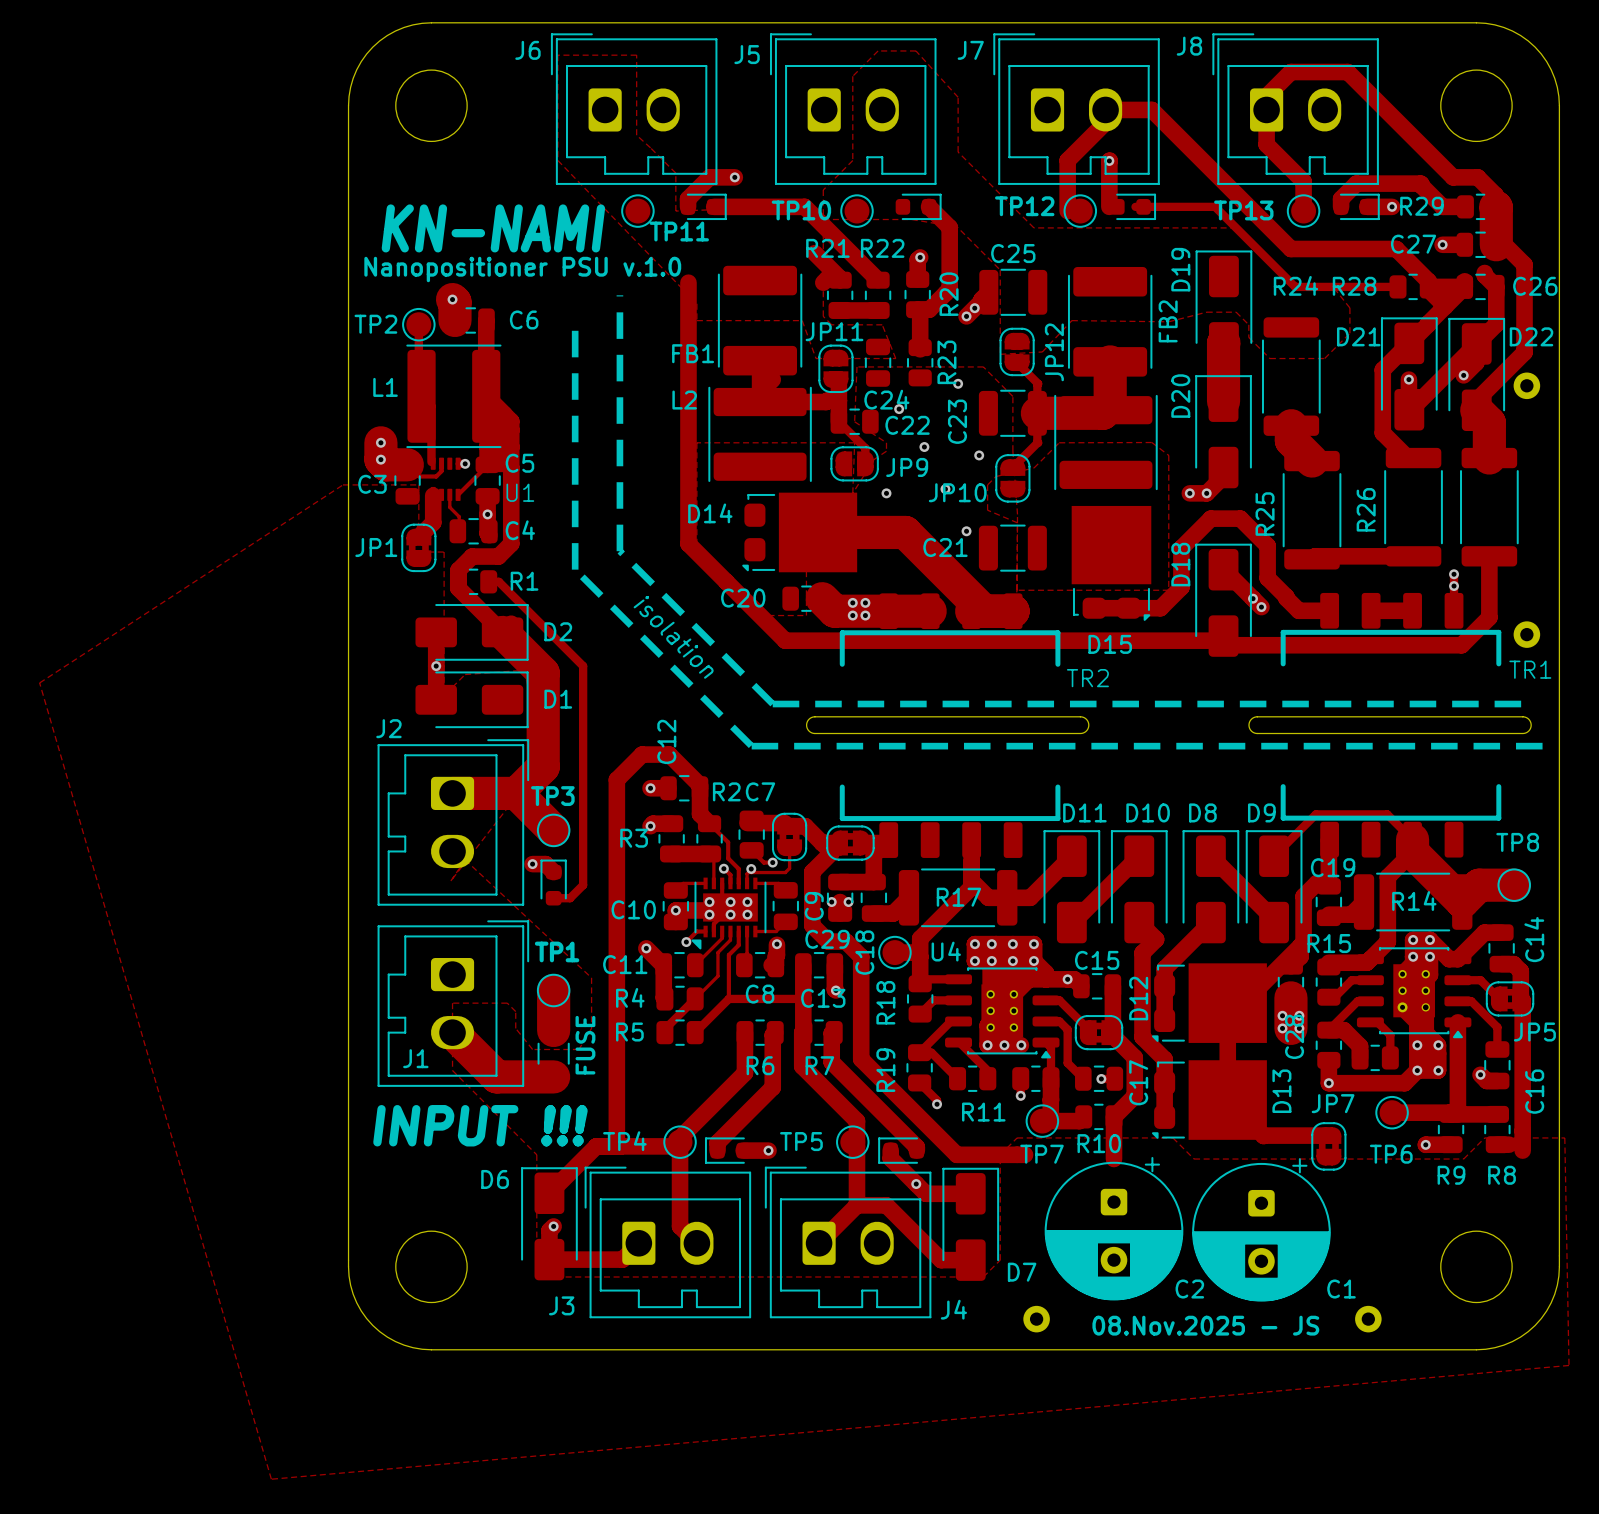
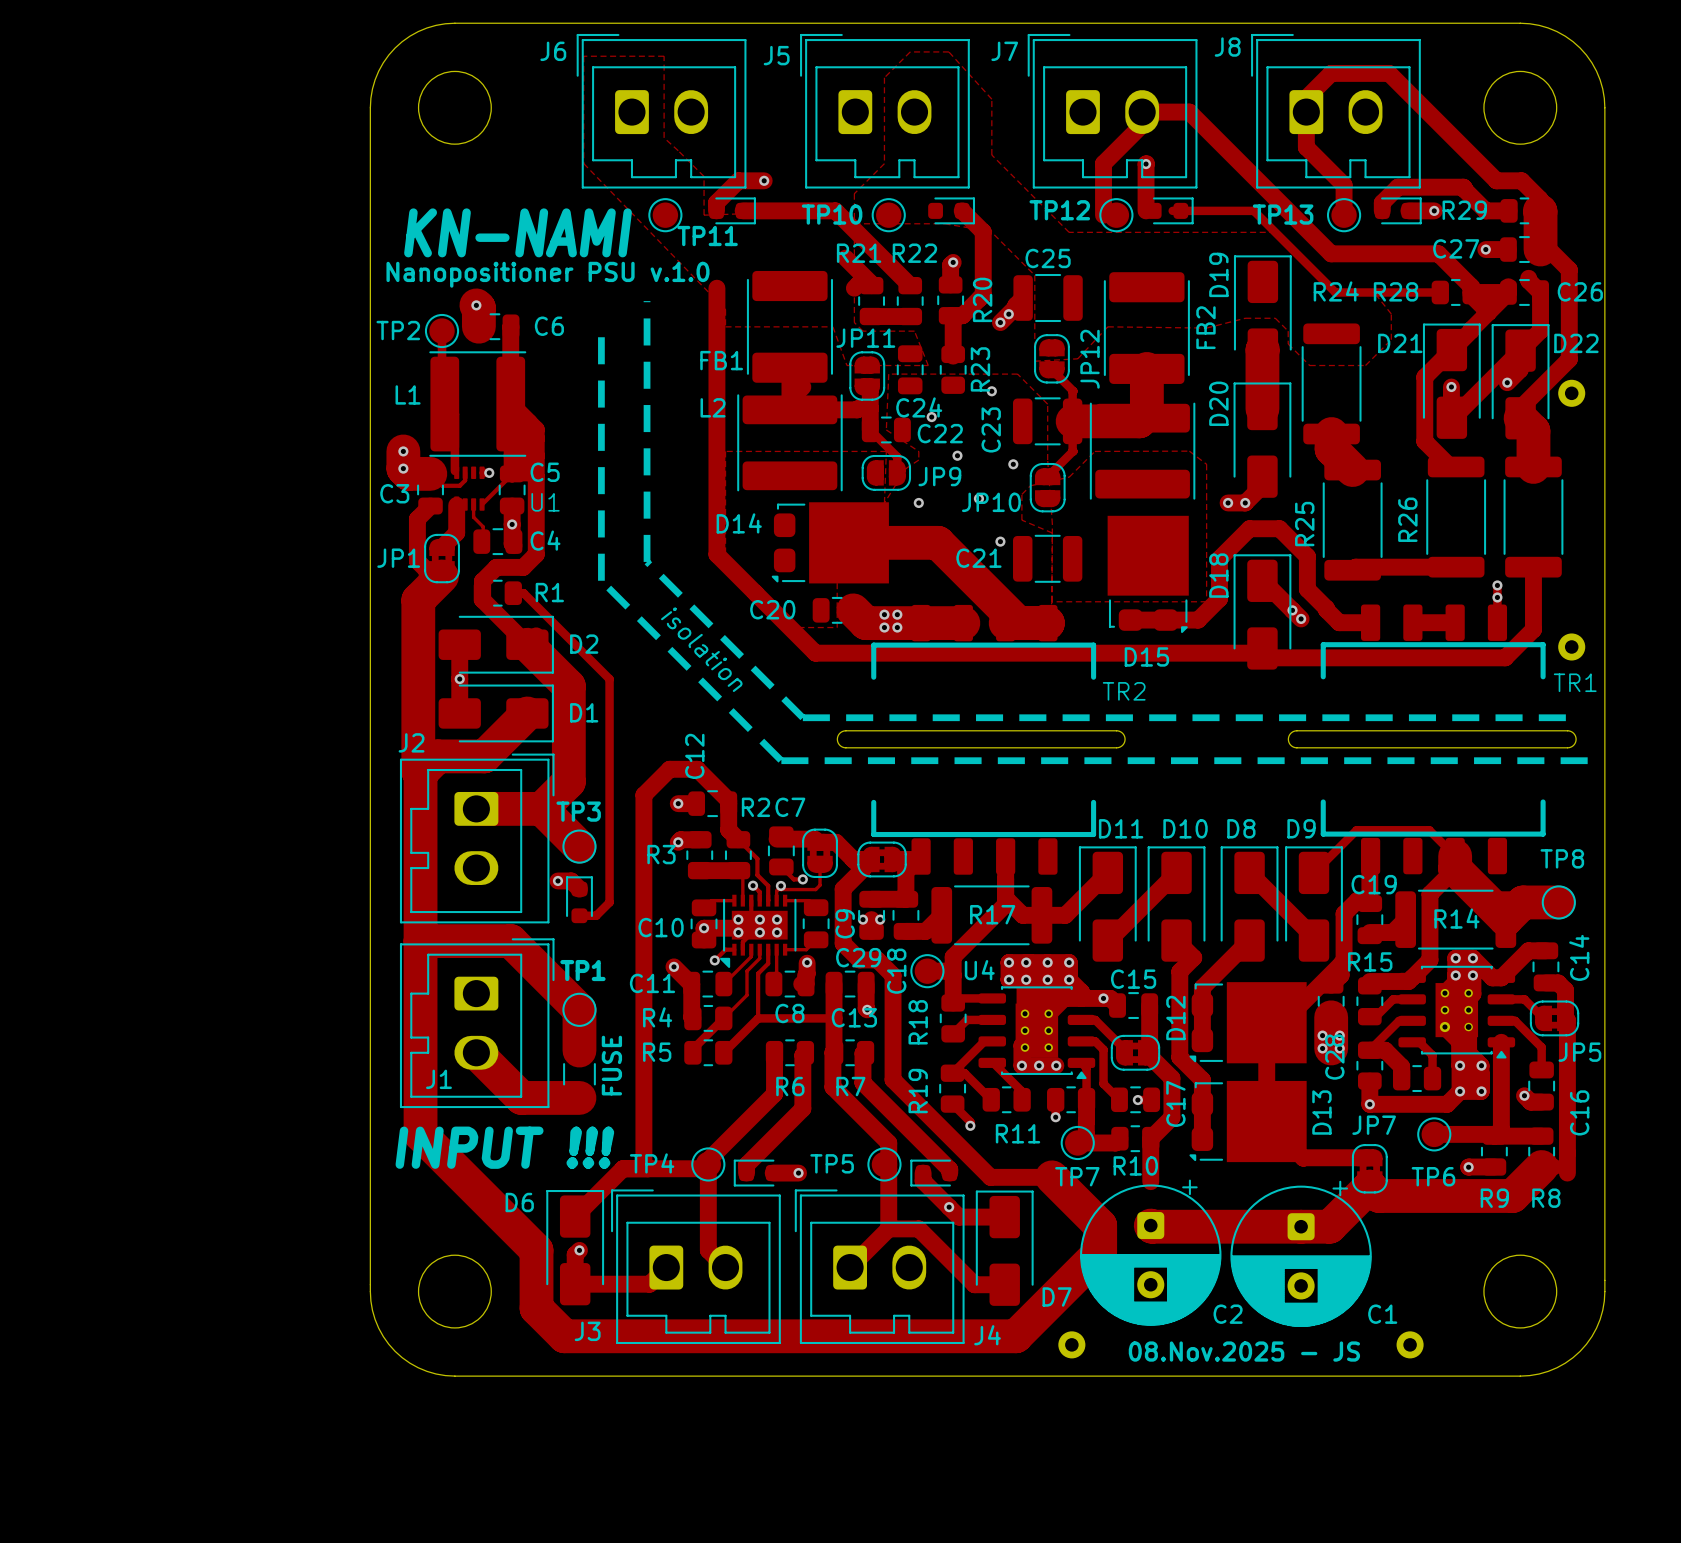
zone outline: (342, 484) (418, 484) (418, 522) (408, 552) (444, 552) (444, 708) (452, 687) (465, 674) (524, 670) (541, 741) (532, 775) (450, 880) (465, 859) (591, 977) (591, 1028) (578, 1049) (532, 1049) (515, 1028) (515, 1011) (507, 1003) (452, 1003) (452, 1070) (536, 1154) (536, 1276) (983, 1276) (1000, 1260) (1000, 1154) (1017, 1137) (1172, 1137) (1194, 1159) (1463, 1159) (1484, 1137) (1564, 1137) (1569, 1365) (271, 1479) (39, 682) (342, 484) -> none
track: none -> (430, 506) (417, 519) (417, 560) (427, 570) (427, 591) (442, 576)
track: none -> (442, 576) (418, 600) (418, 771) (420, 773)
track: none -> (527, 713) (484, 756) (437, 756) (420, 773)
track: none -> (420, 773) (420, 1134) (536, 1250) (536, 1308) (564, 1336) (1015, 1336) (1100, 1252) (1100, 1225) (1051, 1177)
track: none -> (420, 941) (510, 941) (579, 1009)
track: none -> (1541, 1167) (1512, 1195) (1379, 1195) (1369, 1186) (1329, 1226) (1150, 1225)

